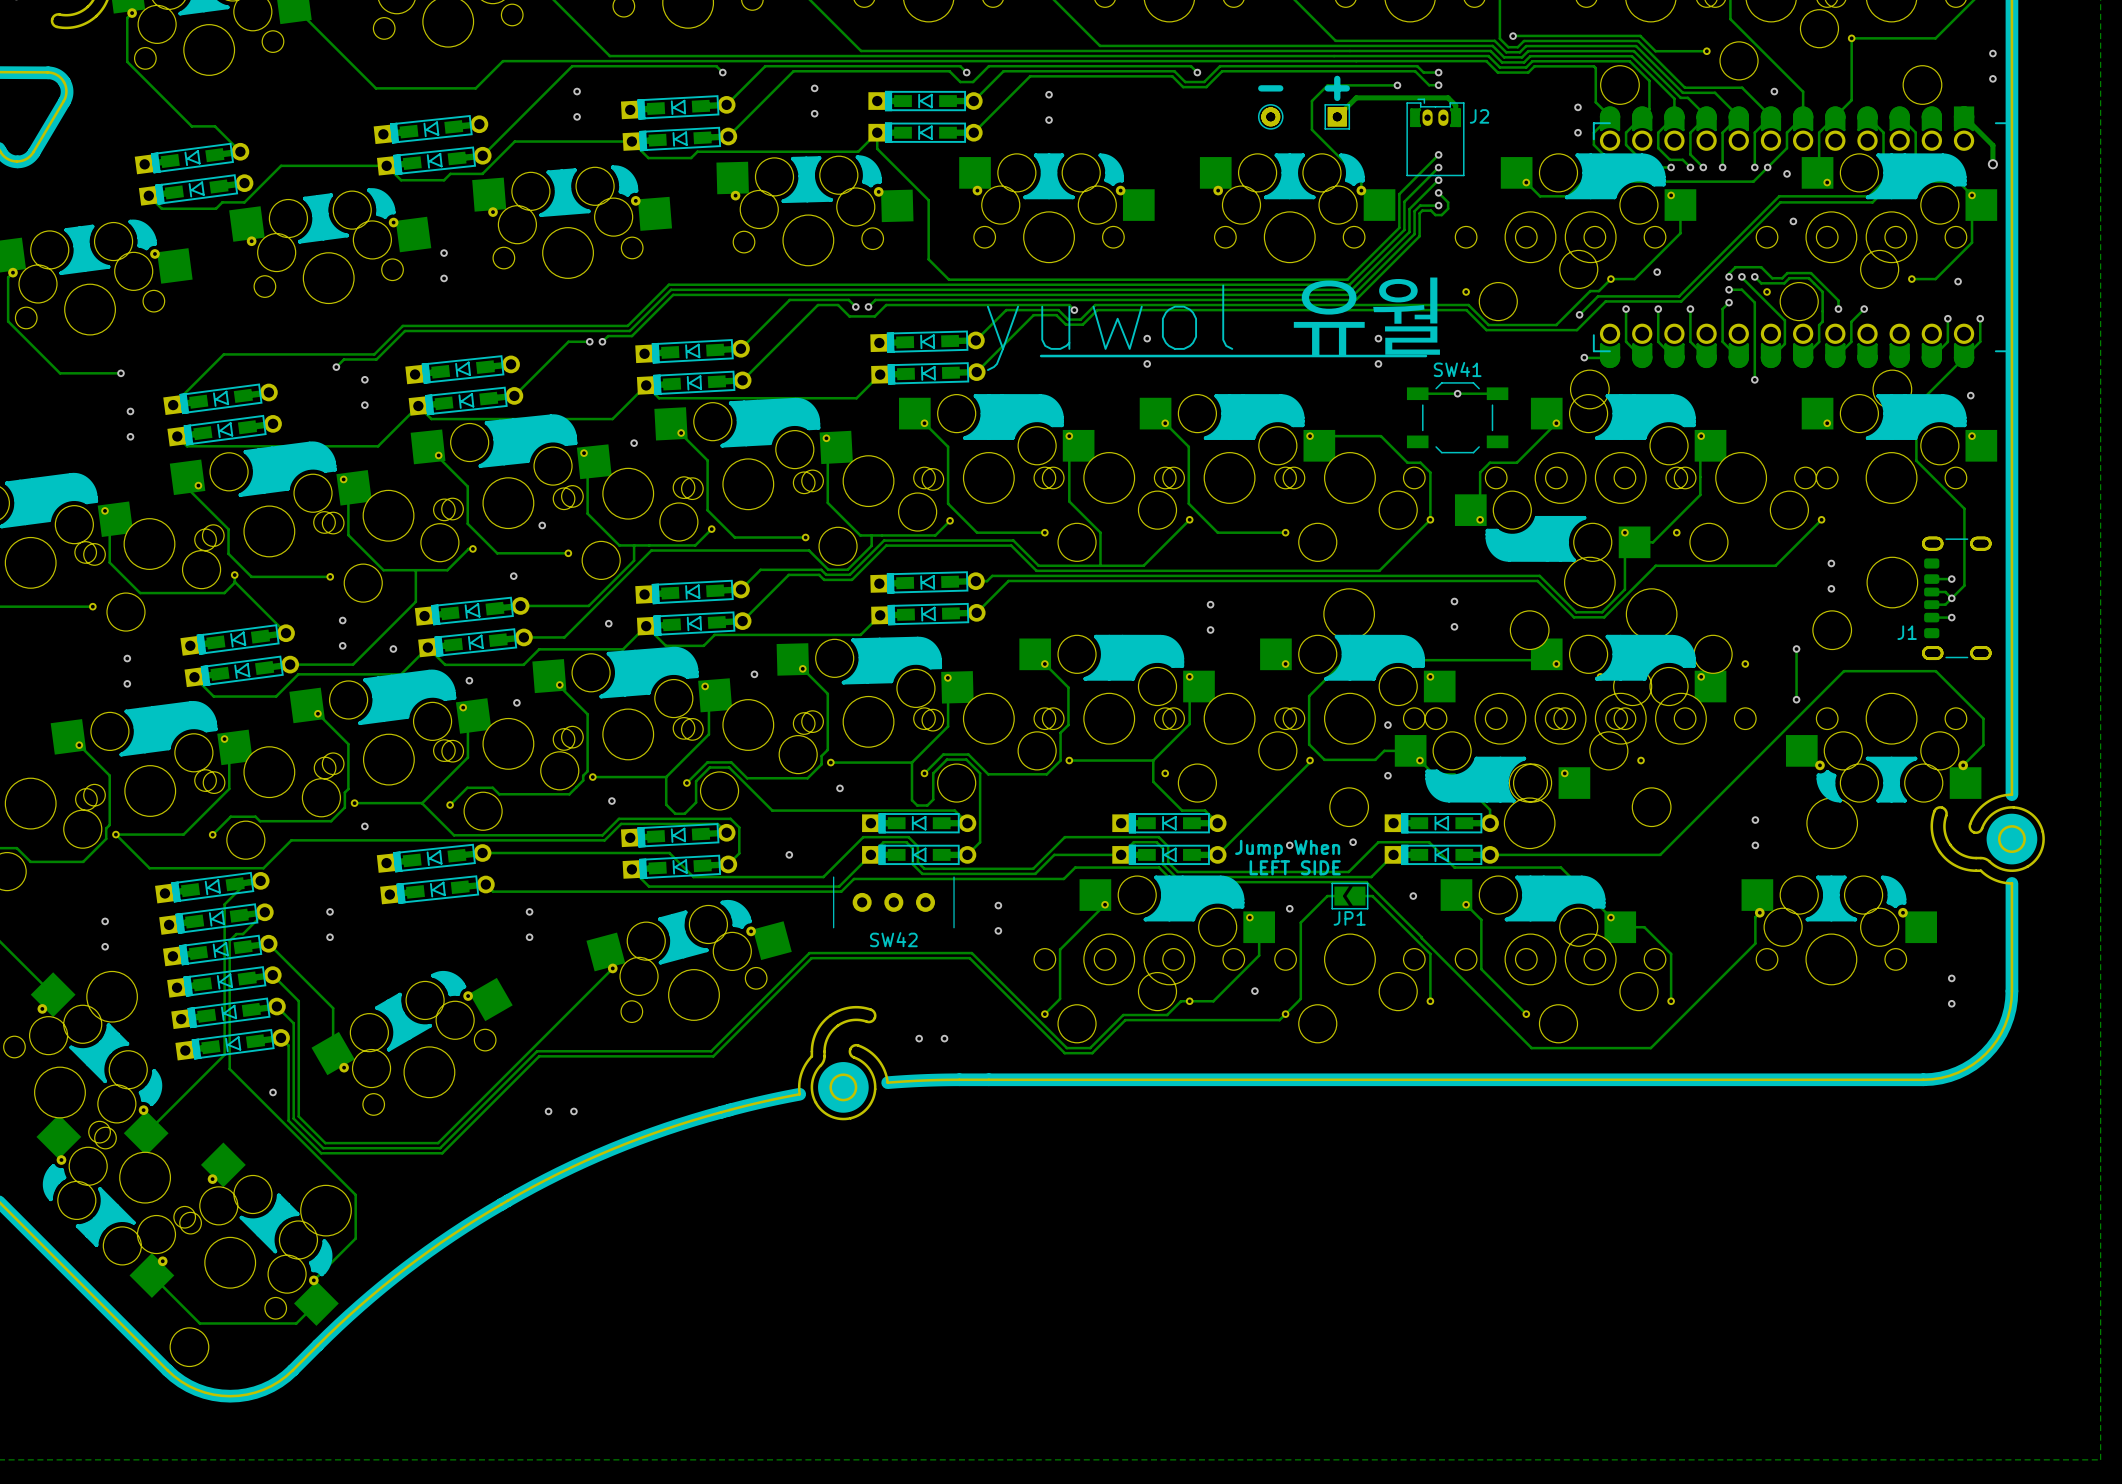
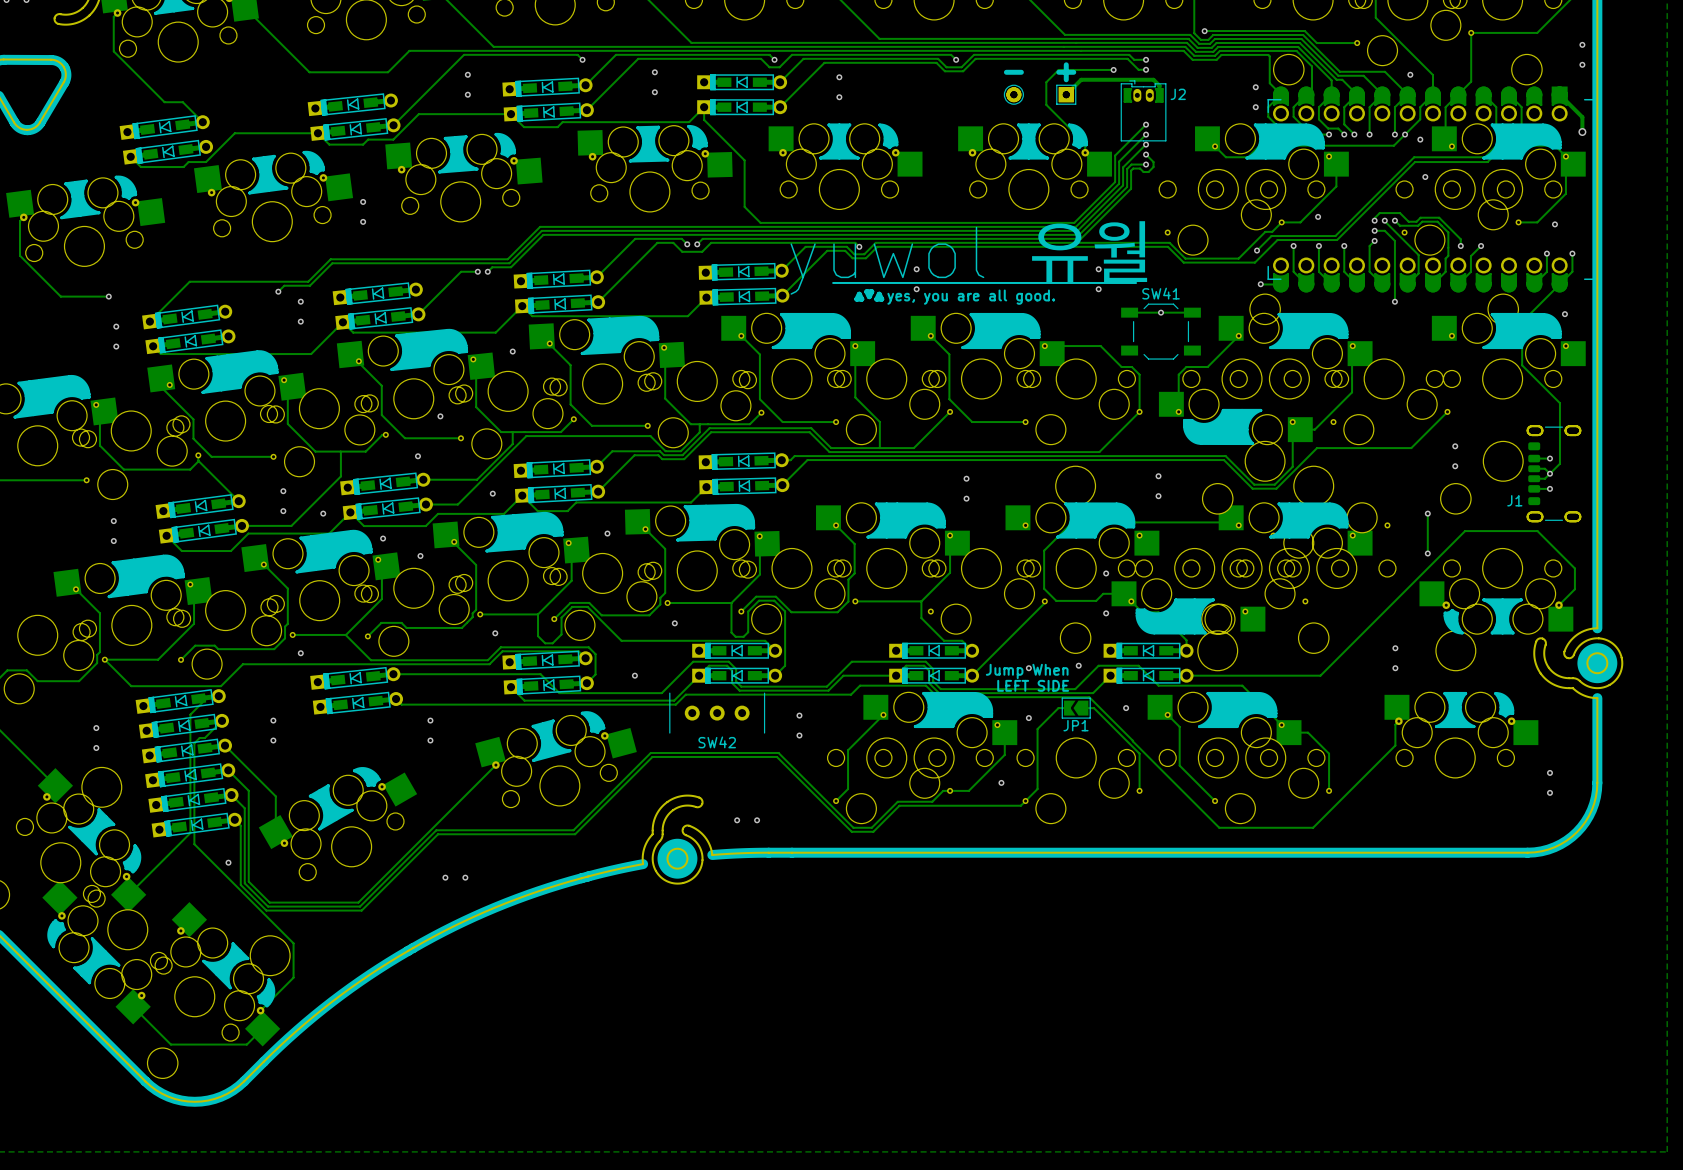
line: none -> (871, 291) (866, 291) (869, 296) (871, 291)
line: none -> (859, 294) (861, 299) (856, 299) (859, 294)
line: none -> (879, 294) (881, 299) (876, 299) (879, 294)
text: none -> yes, you are all good. (971, 297)

